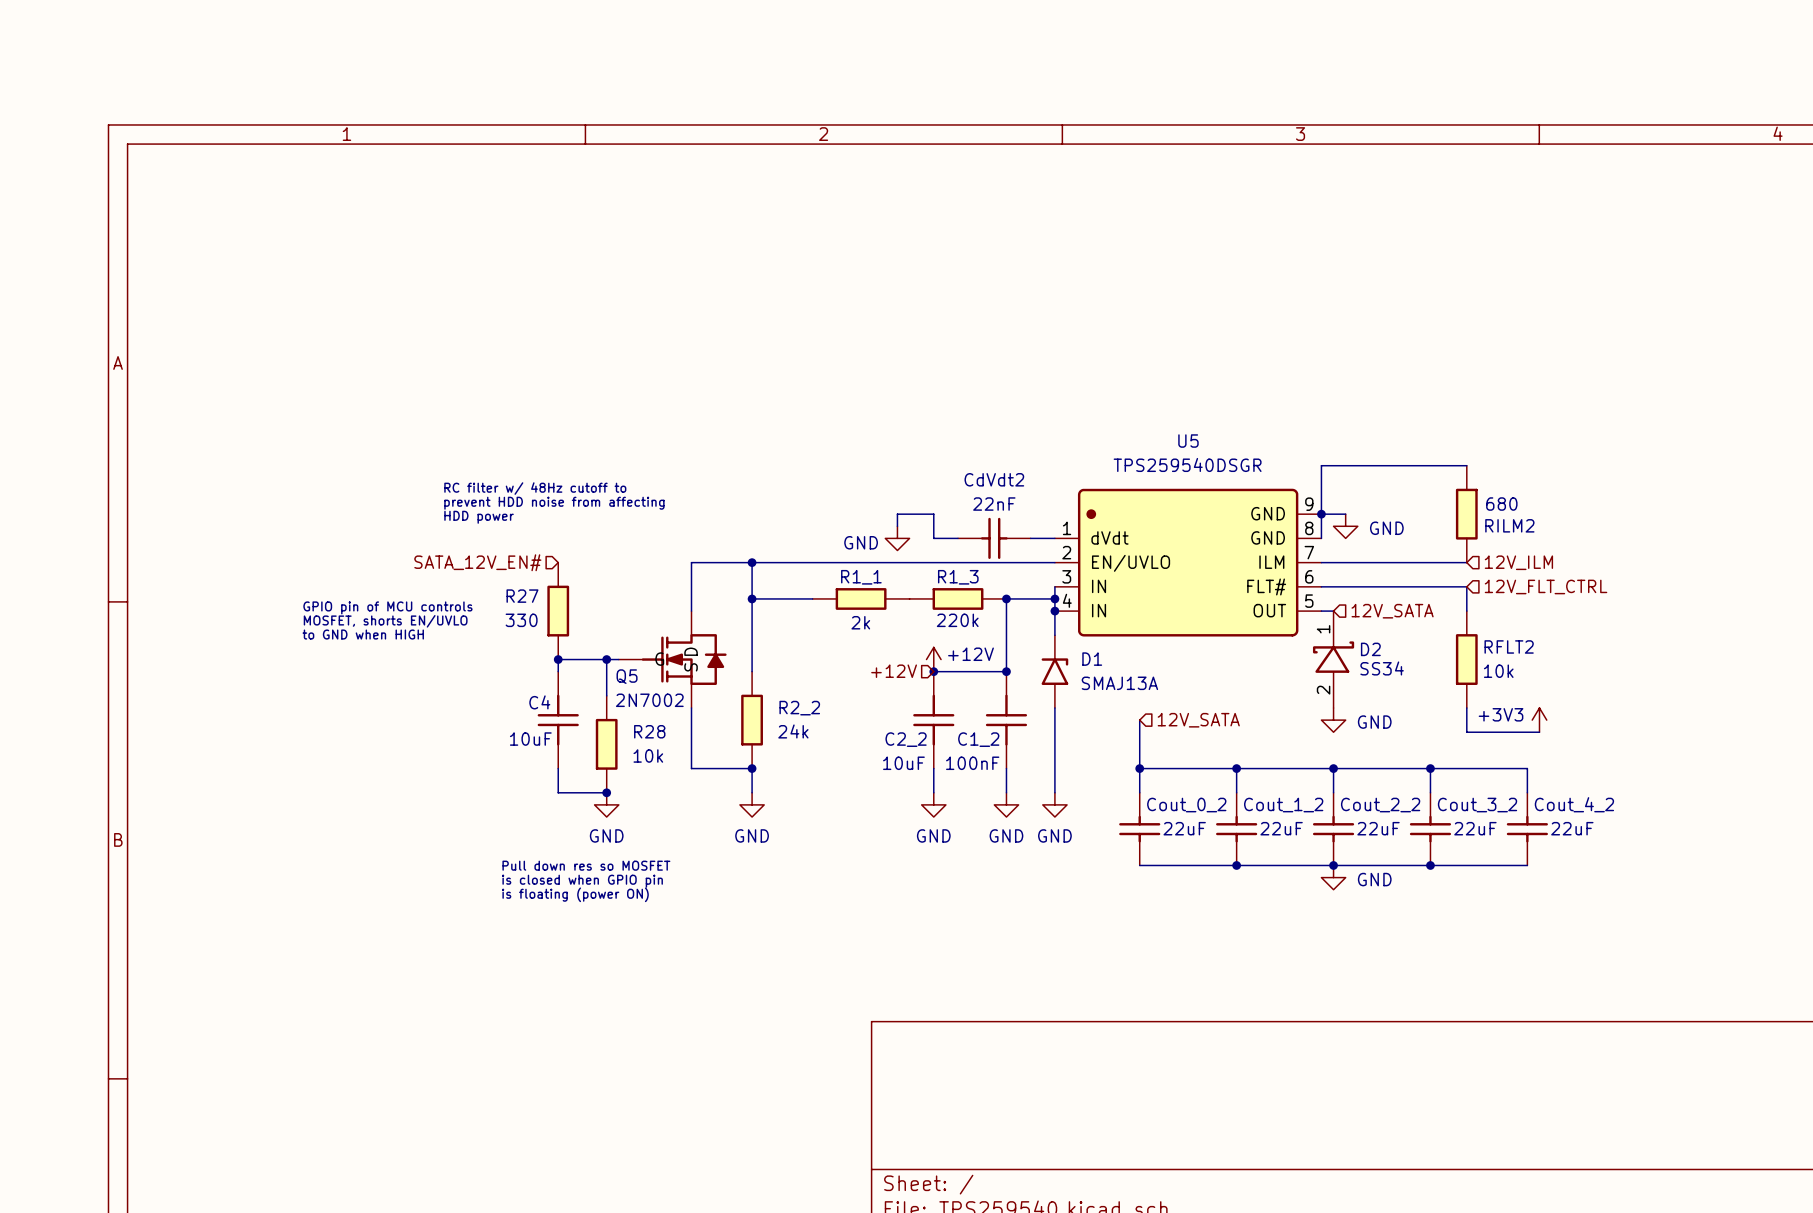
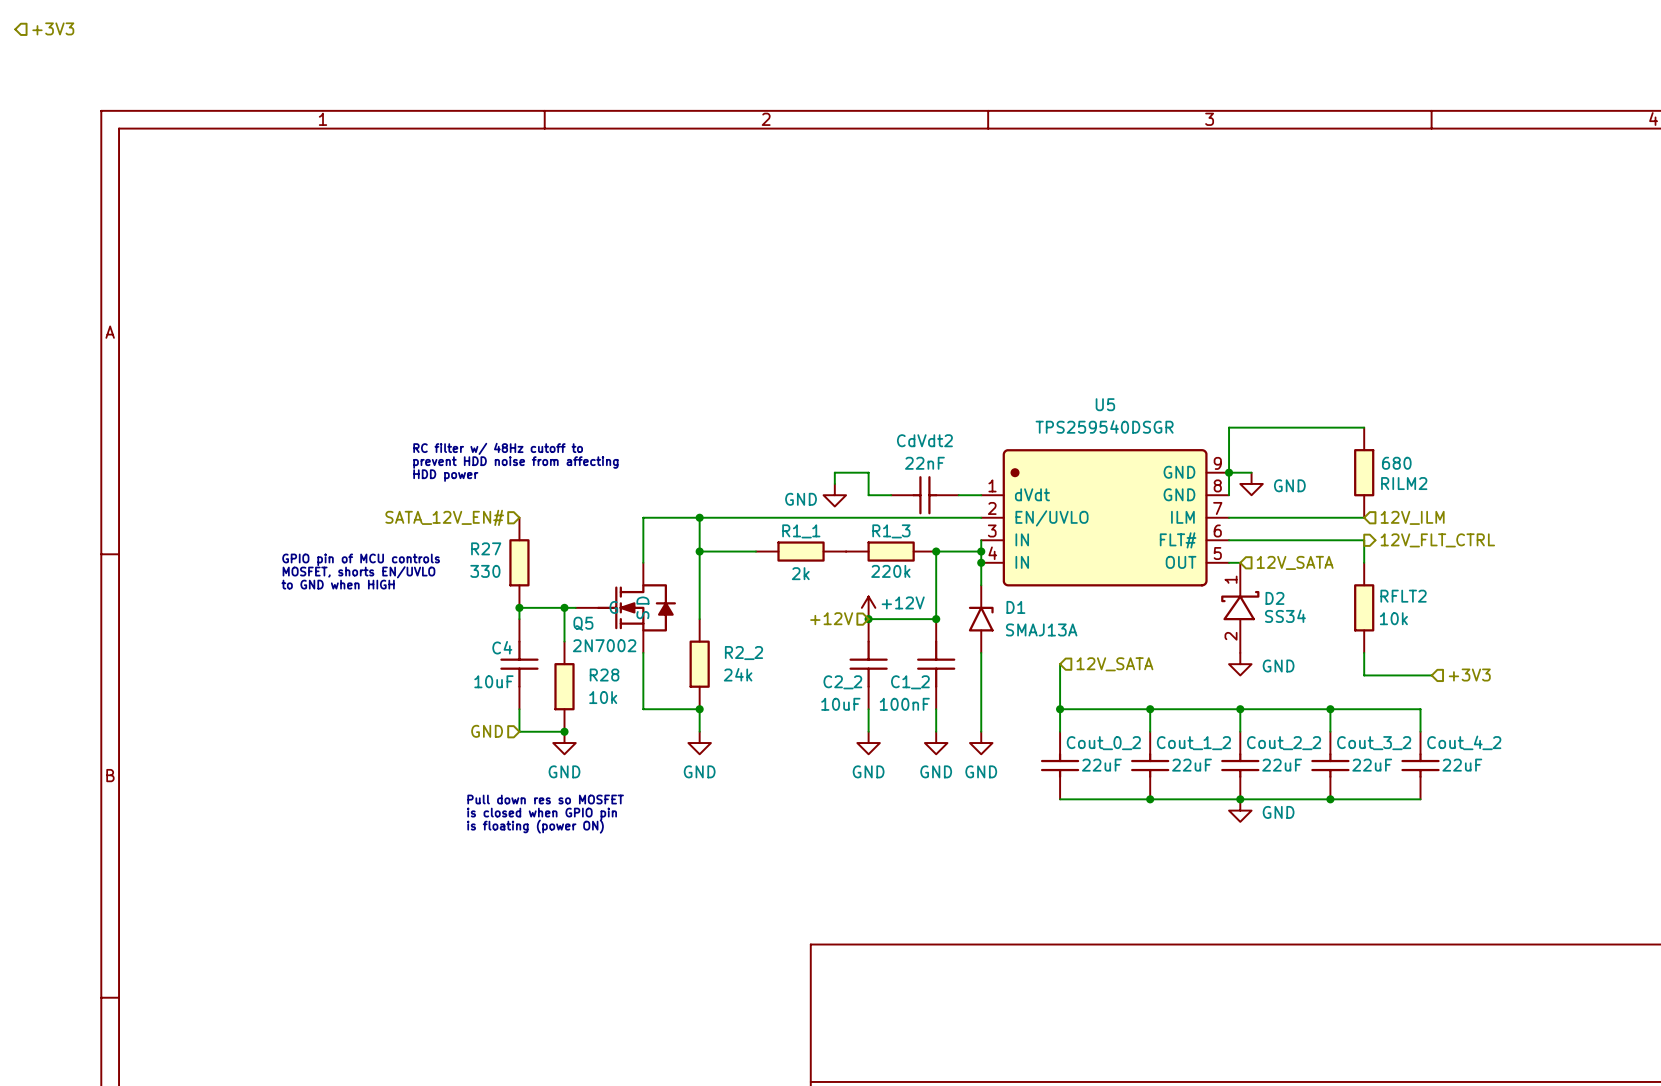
hierarchical label: none -> +3V3 (53, 28)
hierarchical label shape: input (1546, 586) -> output (1437, 540)
power symbol: +3V3 (1539, 720) -> none
hierarchical label: none -> +3V3 (1469, 675)
hierarchical label: none -> GND (487, 731)

